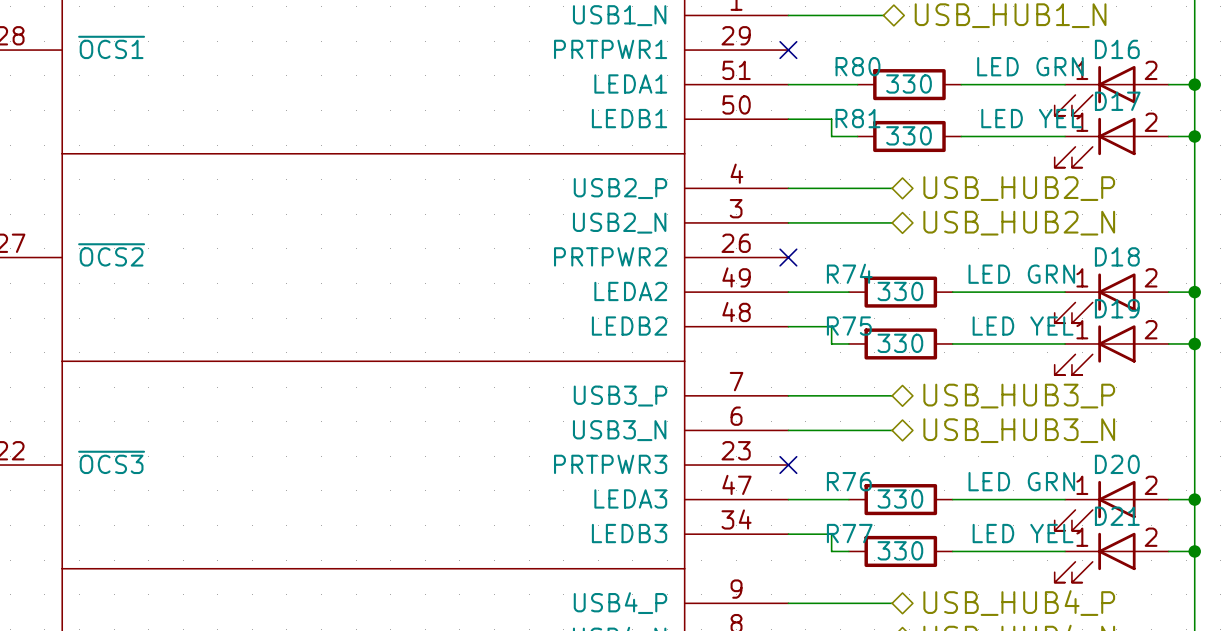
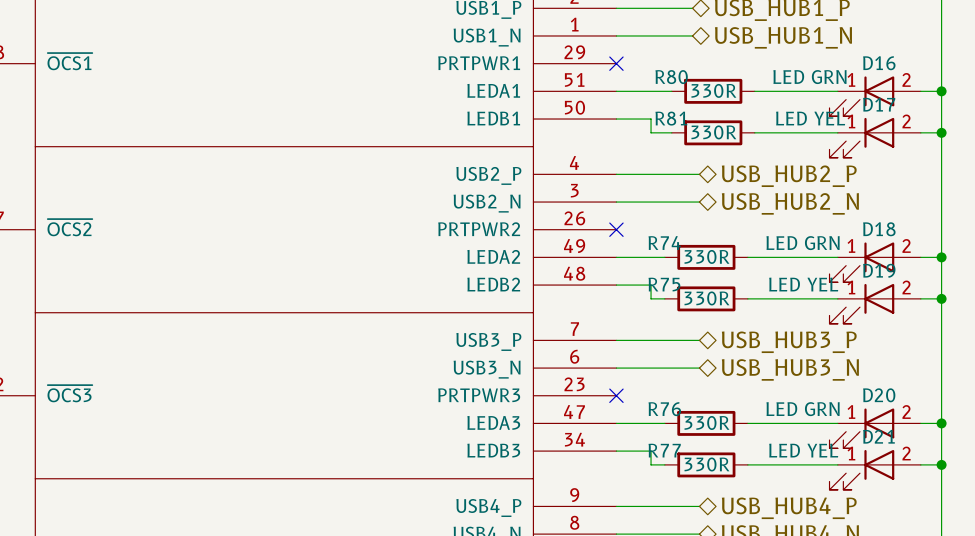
R80 value: 330 (909, 83) -> 330R (713, 90)
R81 value: 330 (909, 135) -> 330R (713, 132)
R74 value: 330 (900, 291) -> 330R (706, 256)
R75 value: 330 (900, 343) -> 330R (706, 298)
R76 value: 330 (900, 498) -> 330R (706, 422)
R77 value: 330 (900, 550) -> 330R (706, 464)

